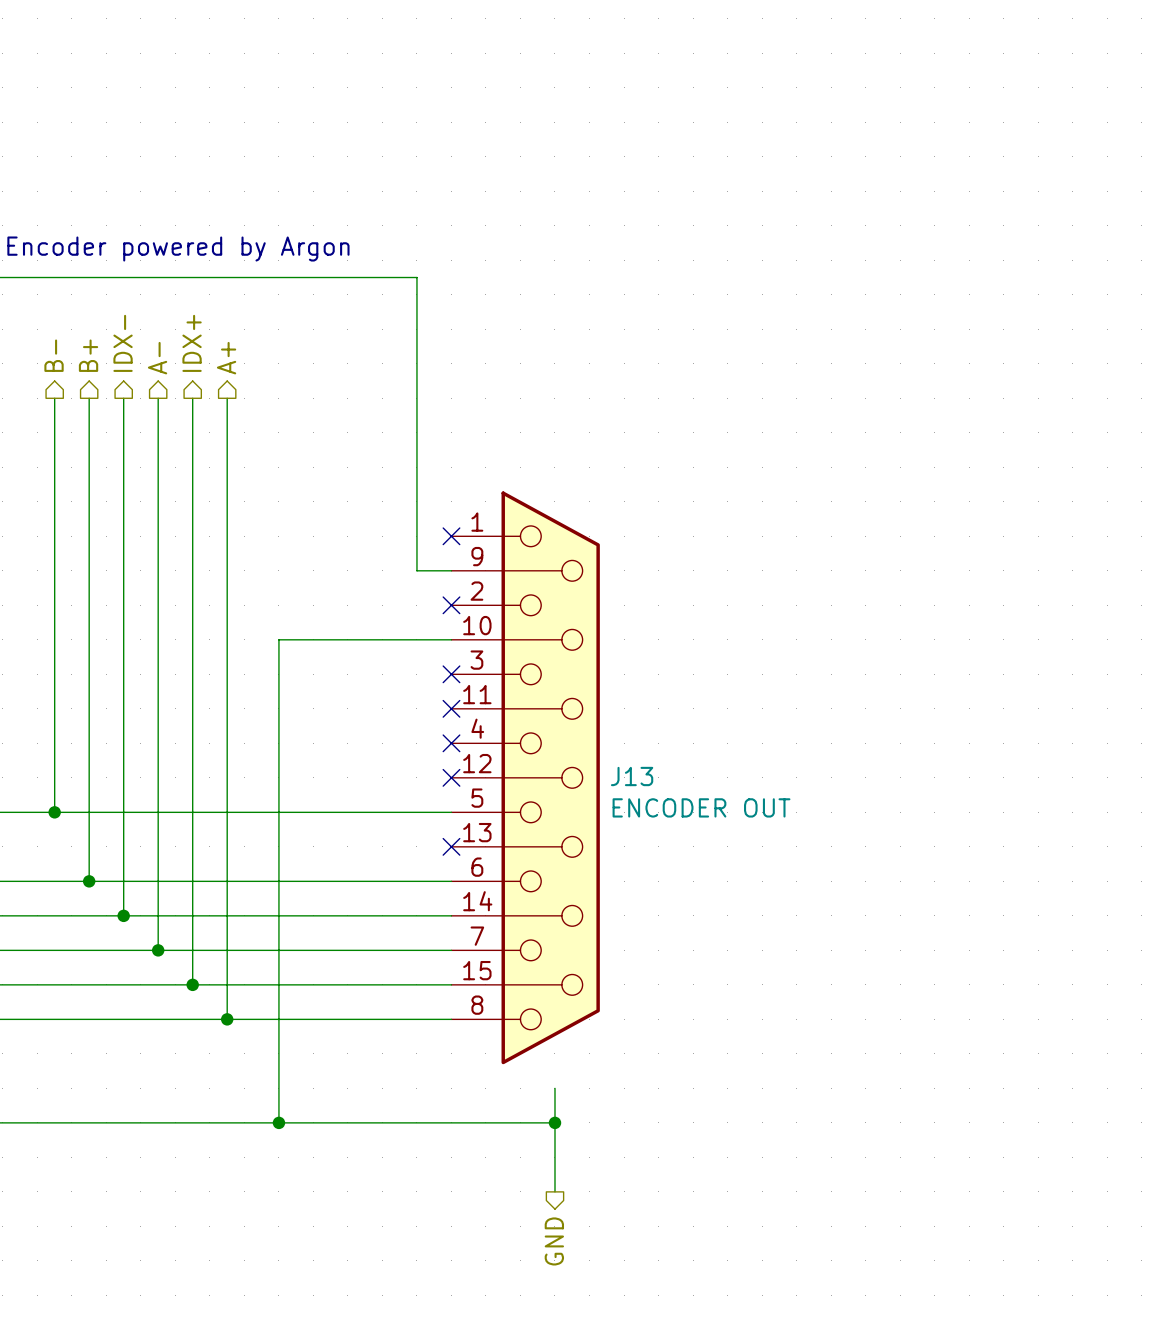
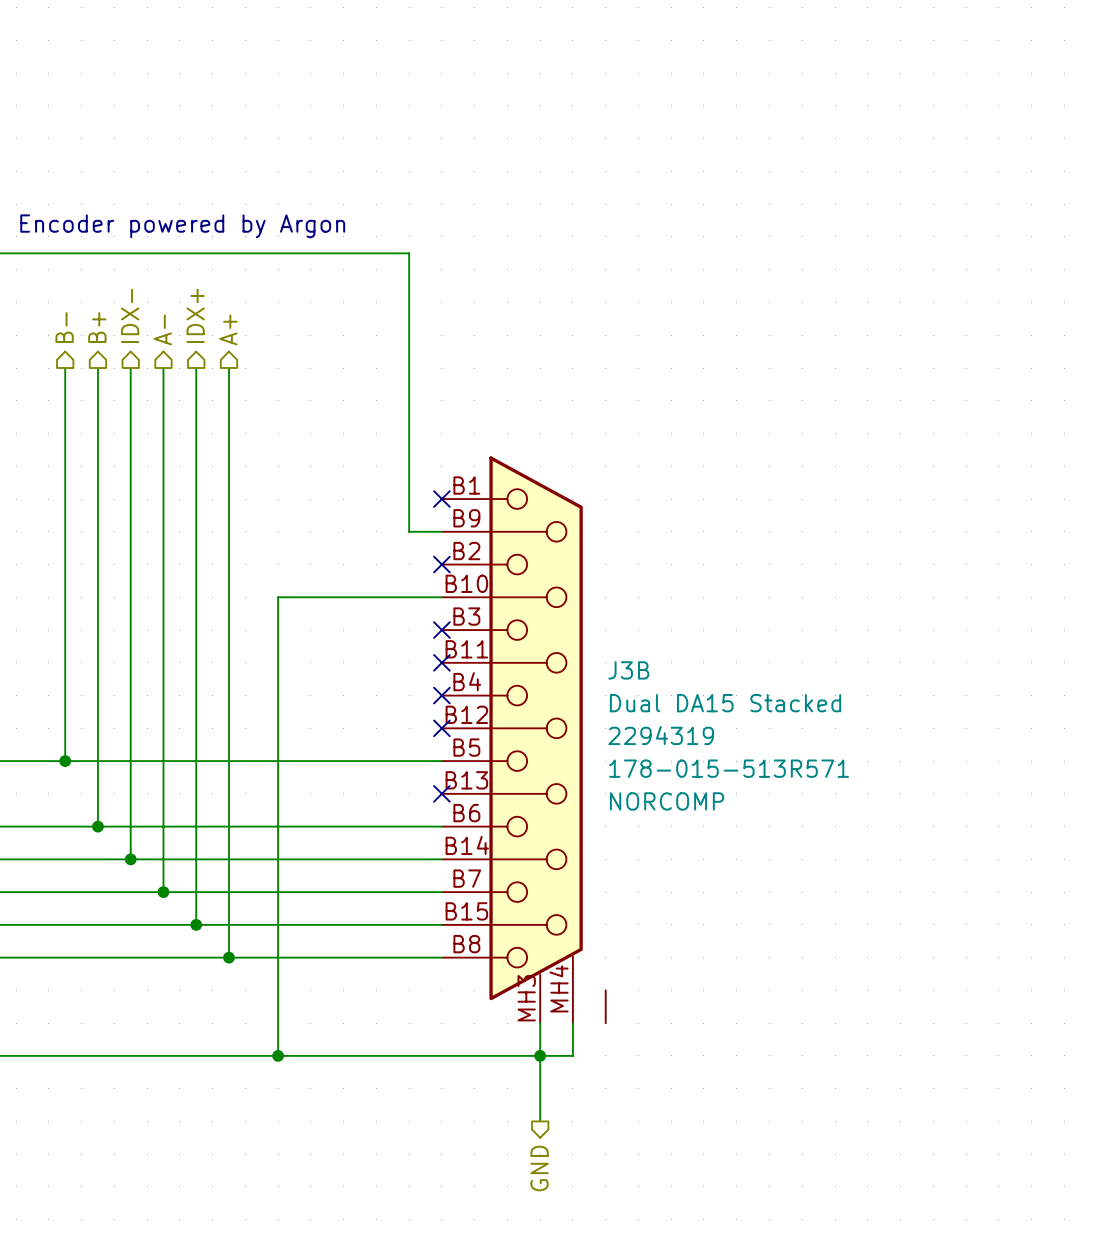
J13: ENCODER OUT (525, 777) -> none
J3B: none -> Dual DA15 Stacked (523, 739)
wire: none -> (572, 1023) (572, 1055) (540, 1055)

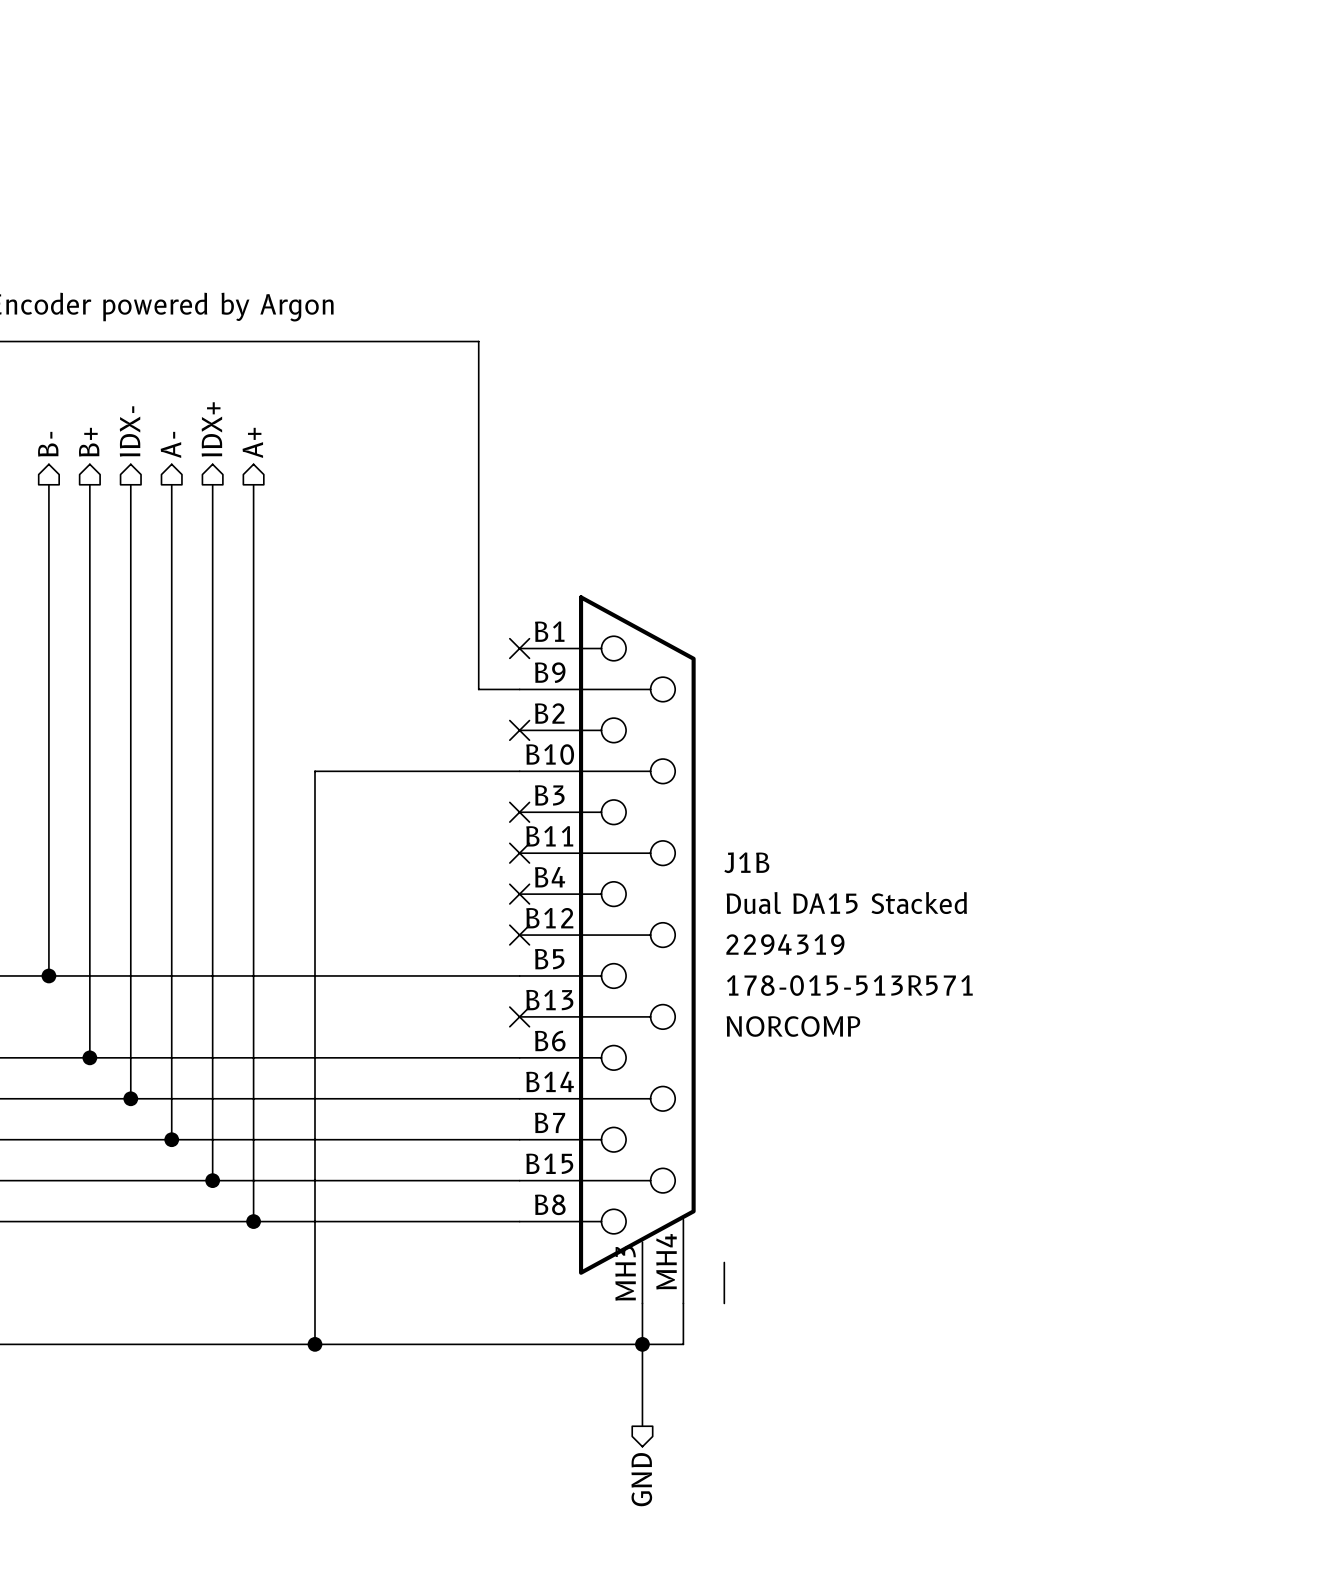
J3B name: J3B (628, 670) -> J1B (746, 862)

